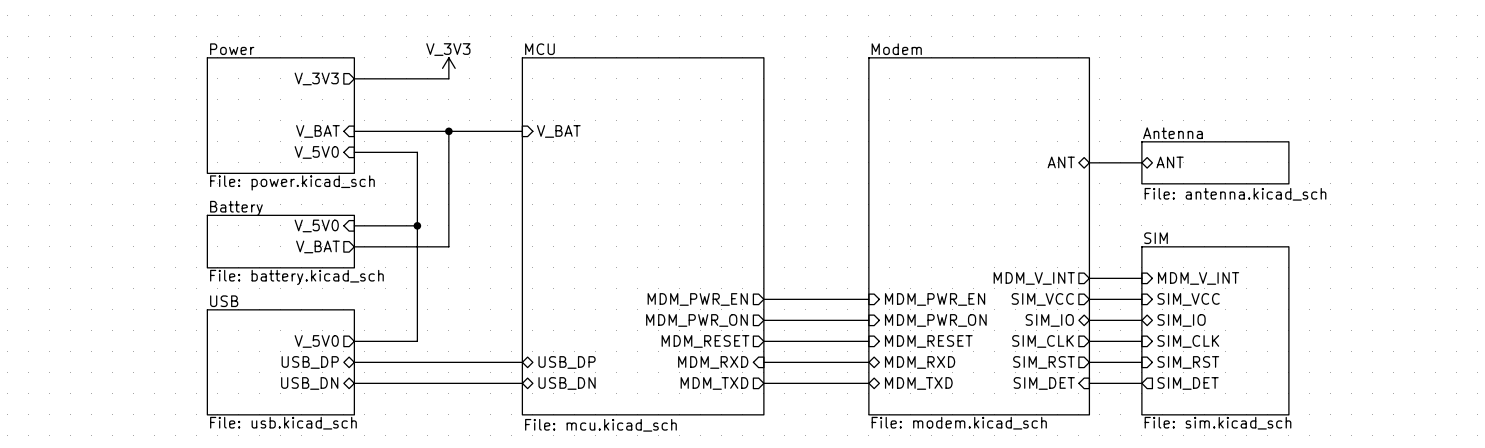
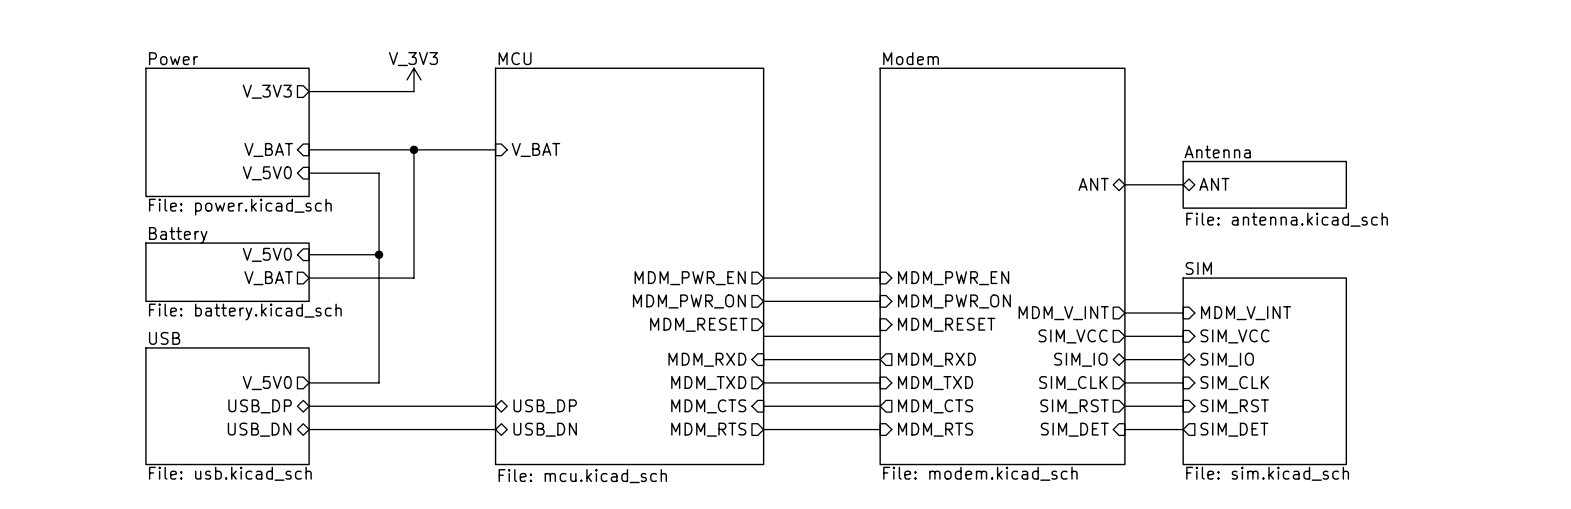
wire: none -> (763, 278) (880, 278)
sheet pin: none -> MDM_PWR_ON (689, 301)
wire: none -> (763, 301) (880, 301)
sheet pin: none -> MDM_PWR_ON (954, 301)
sheet pin: none -> MDM_RESET (698, 324)
sheet pin: none -> MDM_RESET (946, 324)
sheet pin position: MDM_PWR_EN (697, 299) -> MDM_PWR_EN (690, 278)
sheet pin position: MDM_PWR_EN (935, 299) -> MDM_PWR_EN (953, 278)
sheet pin shape: output (696, 320) -> input (707, 359)
sheet pin: MDM_PWR_ON (696, 320) -> MDM_RXD (707, 359)
sheet pin shape: input (935, 320) -> output (936, 359)
sheet pin: MDM_PWR_ON (935, 320) -> MDM_RXD (936, 359)
sheet pin: MDM_RESET (705, 341) -> MDM_TXD (708, 383)
sheet pin: MDM_RESET (928, 341) -> MDM_TXD (935, 383)
sheet pin: MDM_RXD (713, 362) -> MDM_CTS (708, 406)
sheet pin shape: bidirectional (920, 362) -> output (935, 406)
sheet pin: MDM_RXD (920, 362) -> MDM_CTS (935, 406)
sheet pin: MDM_TXD (714, 383) -> MDM_RTS (708, 429)
sheet pin shape: bidirectional (918, 383) -> input (935, 429)
sheet pin: MDM_TXD (918, 383) -> MDM_RTS (935, 429)

